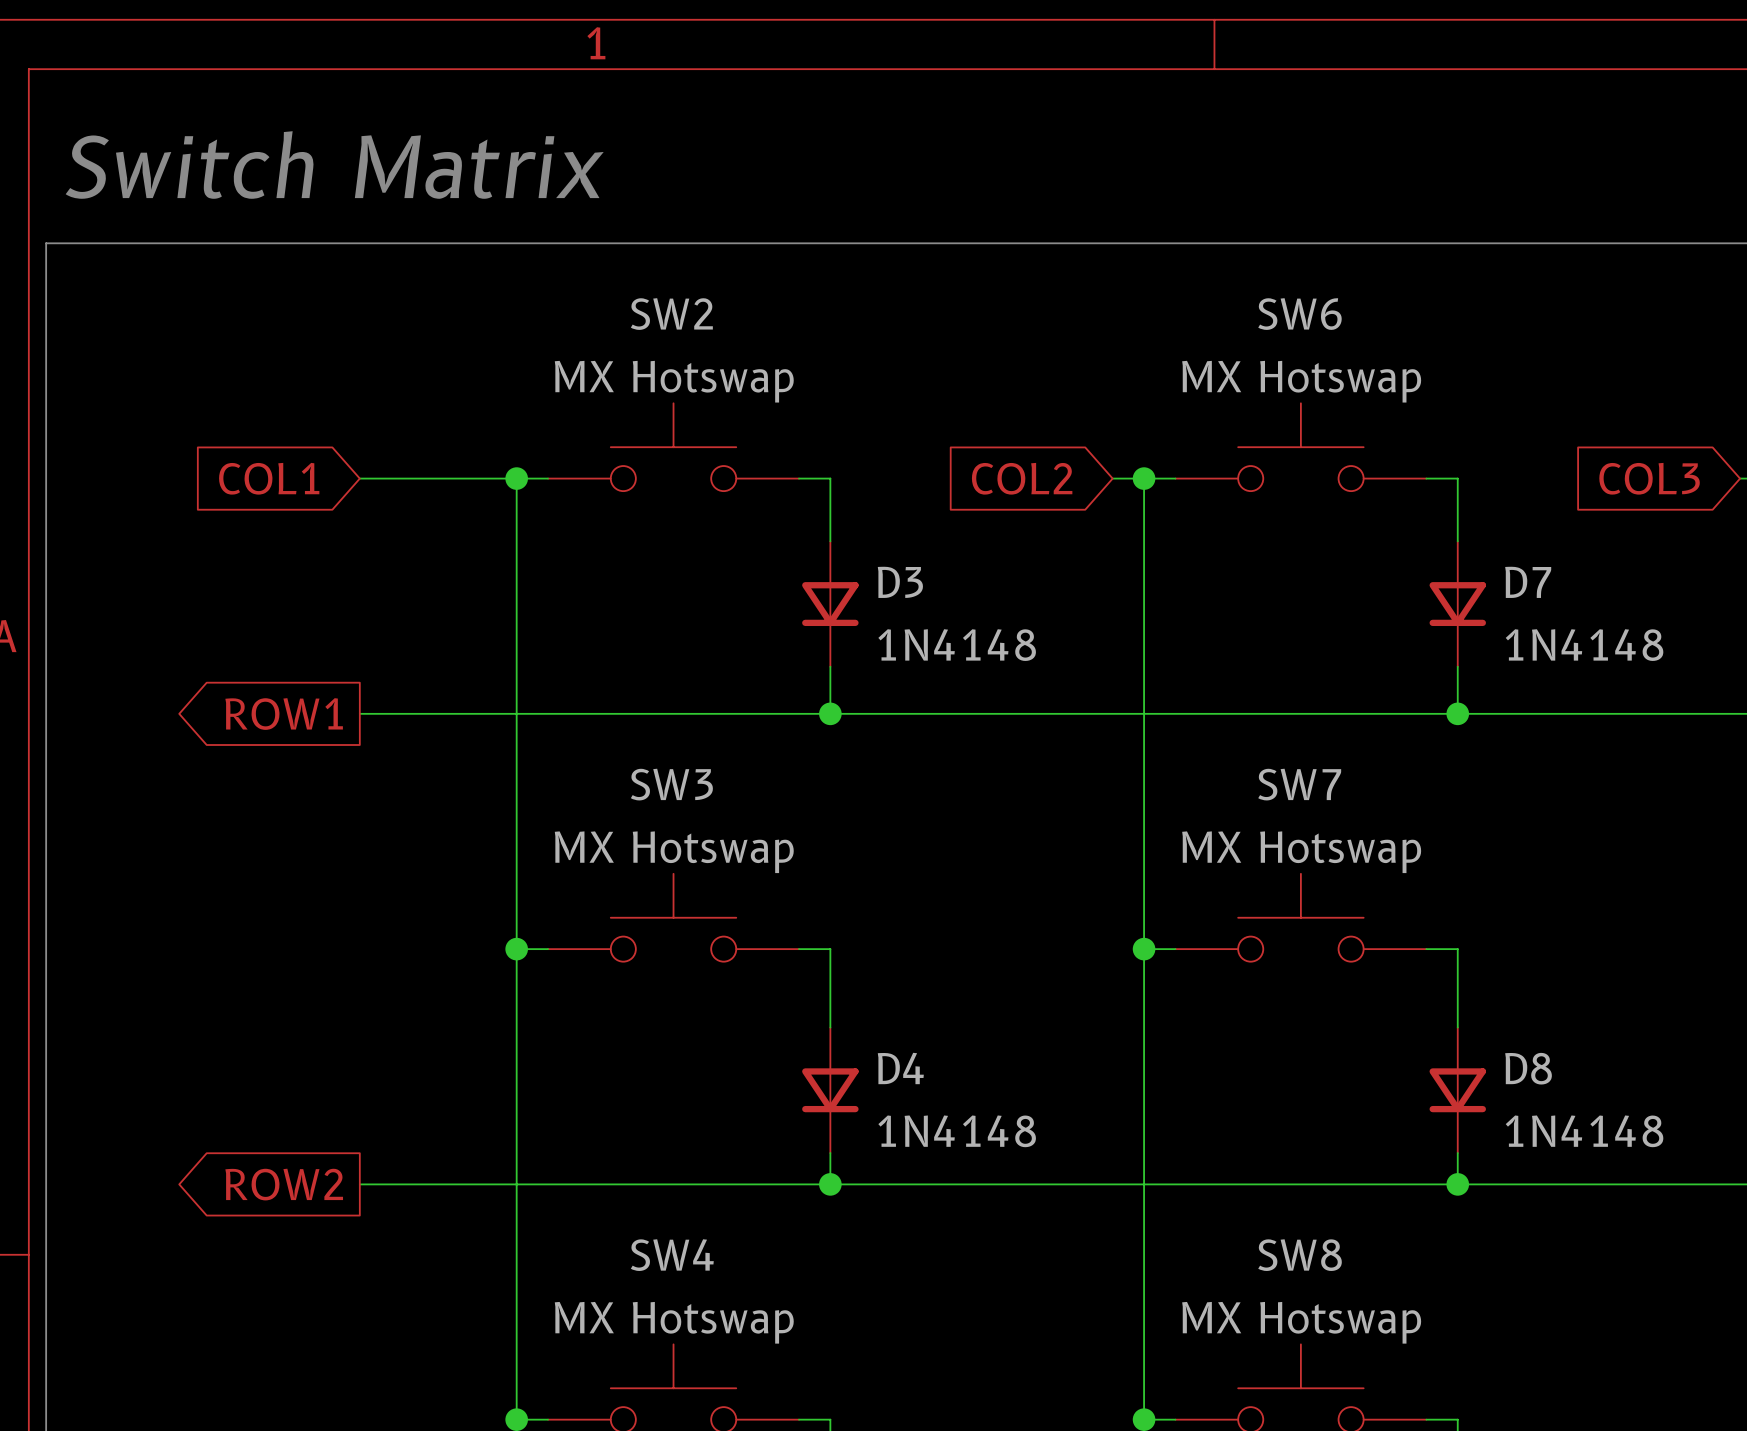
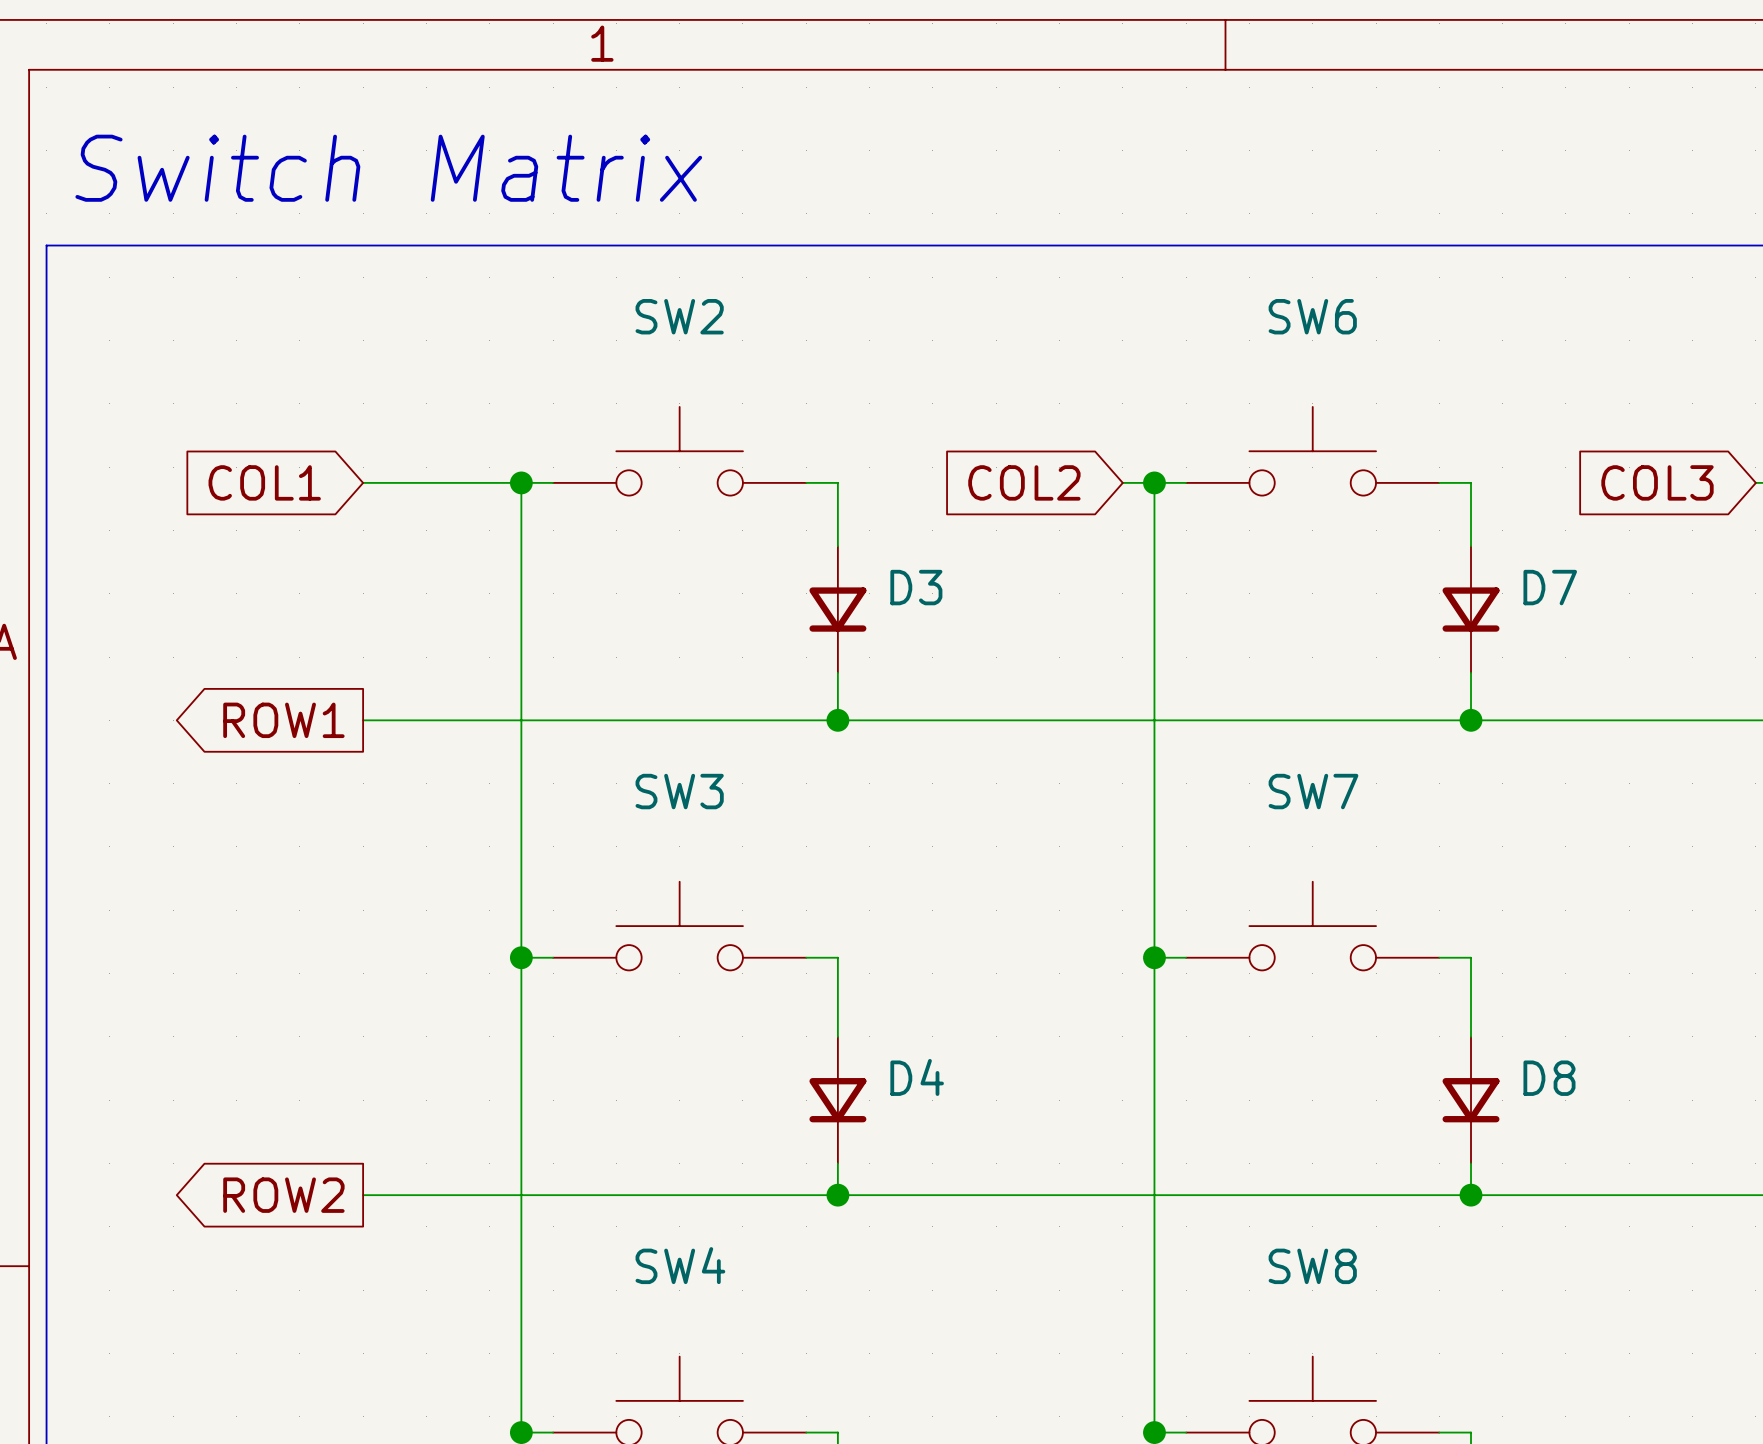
SW2 value: MX Hotswap (674, 381) -> none
SW6 value: MX Hotswap (1301, 381) -> none
D3 value: 1N4148 (957, 645) -> none
D7 value: 1N4148 (1584, 645) -> none
SW3 value: MX Hotswap (674, 852) -> none
SW7 value: MX Hotswap (1301, 852) -> none
D4 value: 1N4148 (957, 1131) -> none
D8 value: 1N4148 (1584, 1131) -> none
SW4 value: MX Hotswap (674, 1322) -> none
SW8 value: MX Hotswap (1301, 1322) -> none

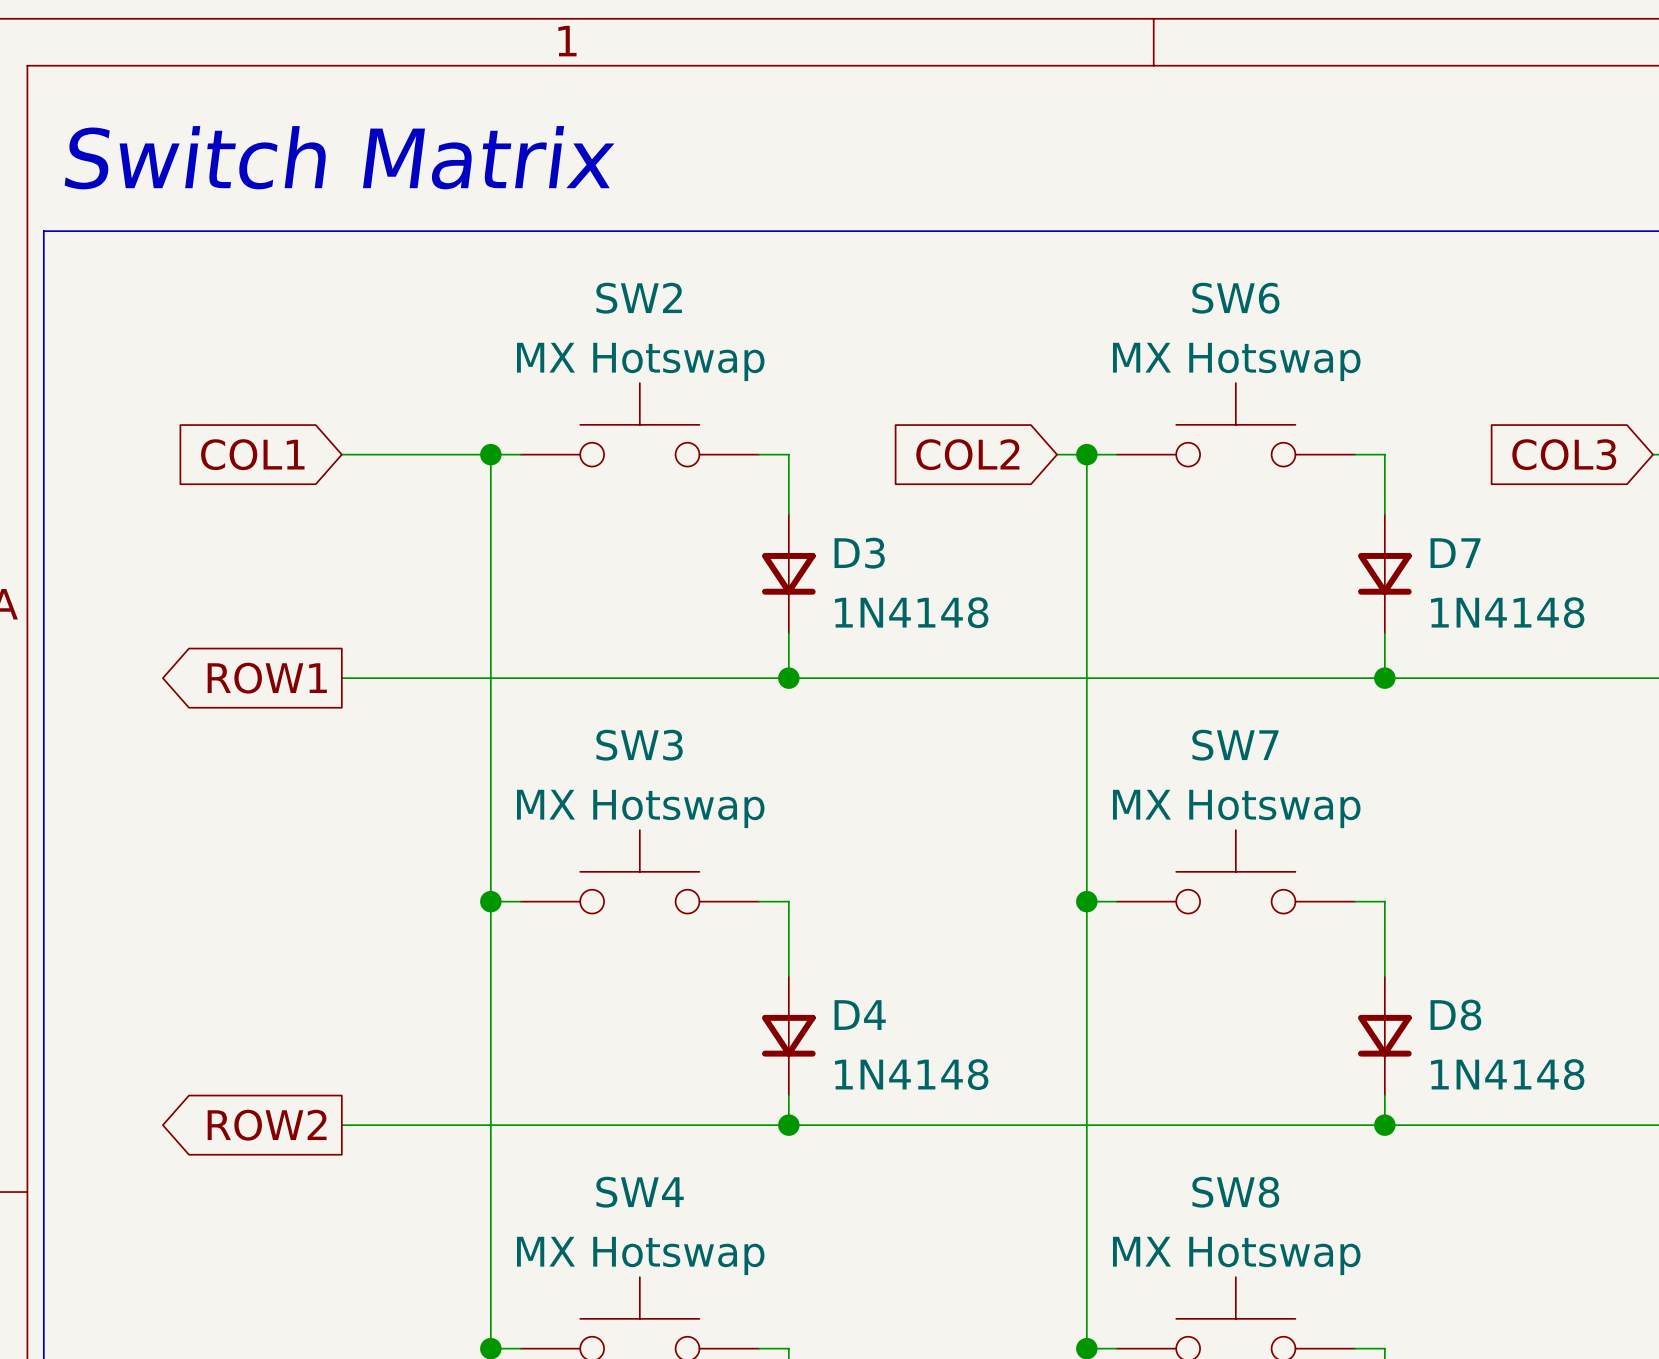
SW2 value: none -> MX Hotswap (640, 361)
SW6 value: none -> MX Hotswap (1236, 361)
D3 value: none -> 1N4148 (911, 612)
D7 value: none -> 1N4148 (1507, 612)
SW3 value: none -> MX Hotswap (640, 808)
SW7 value: none -> MX Hotswap (1236, 808)
D4 value: none -> 1N4148 (911, 1074)
D8 value: none -> 1N4148 (1507, 1074)
SW4 value: none -> MX Hotswap (640, 1255)
SW8 value: none -> MX Hotswap (1236, 1255)

